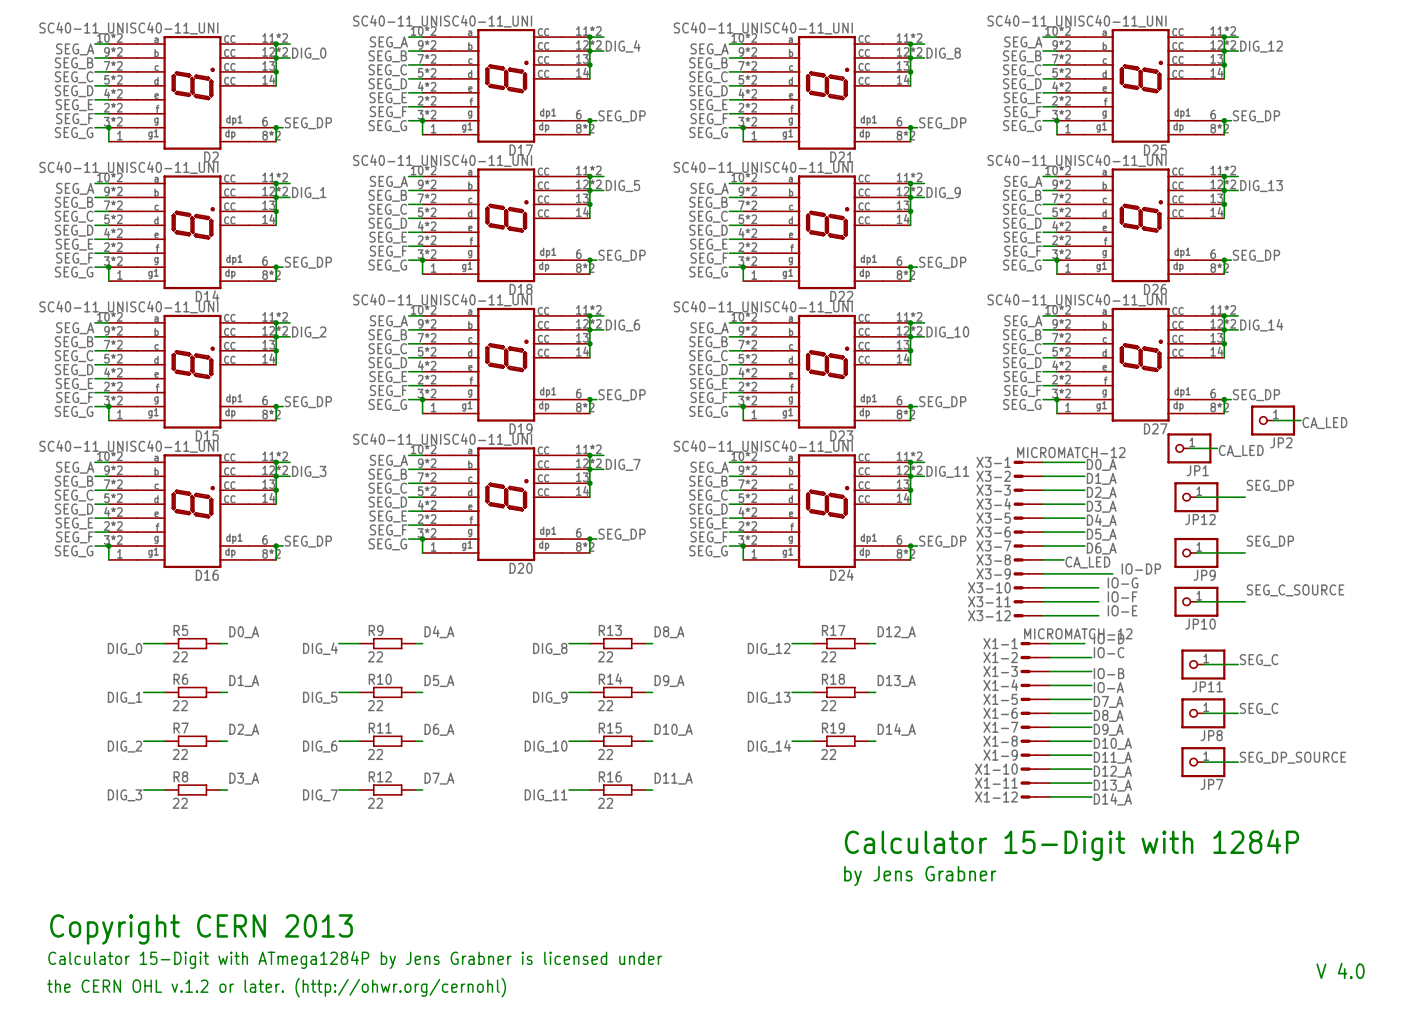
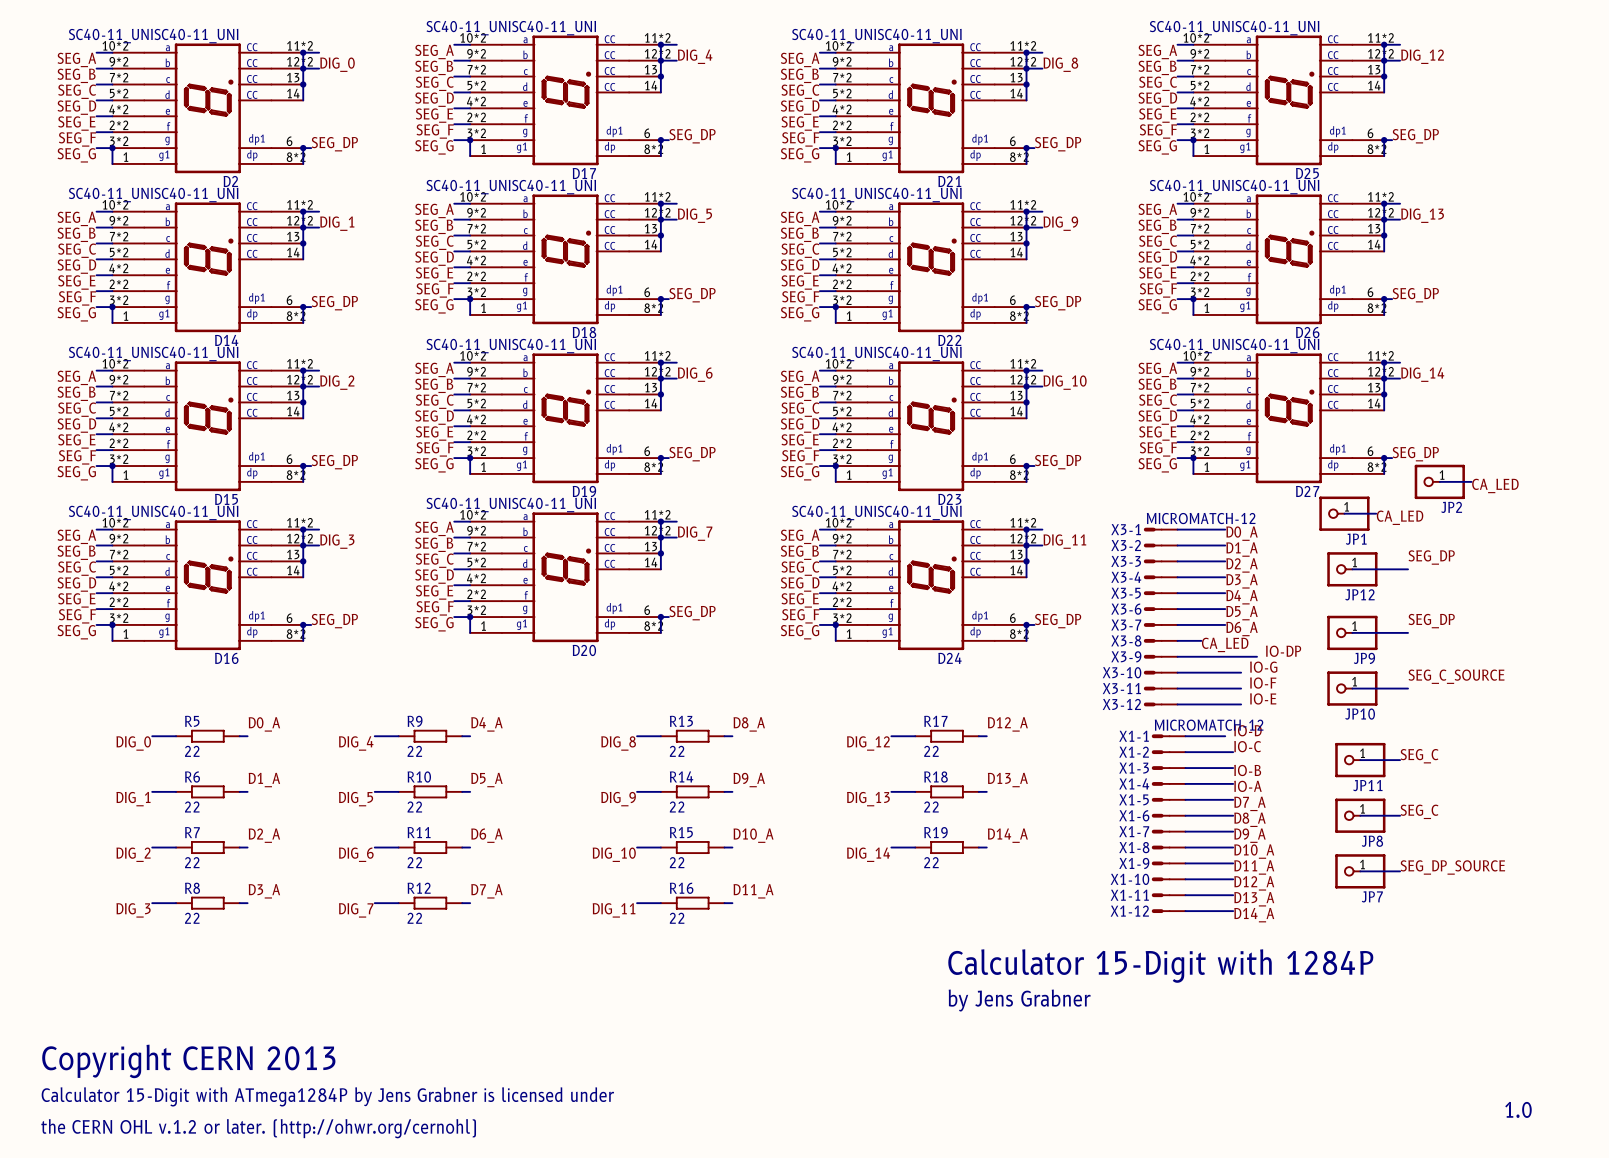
text: V 4.0 (1340, 970) -> none
text: none -> 1.0 (1518, 1109)

